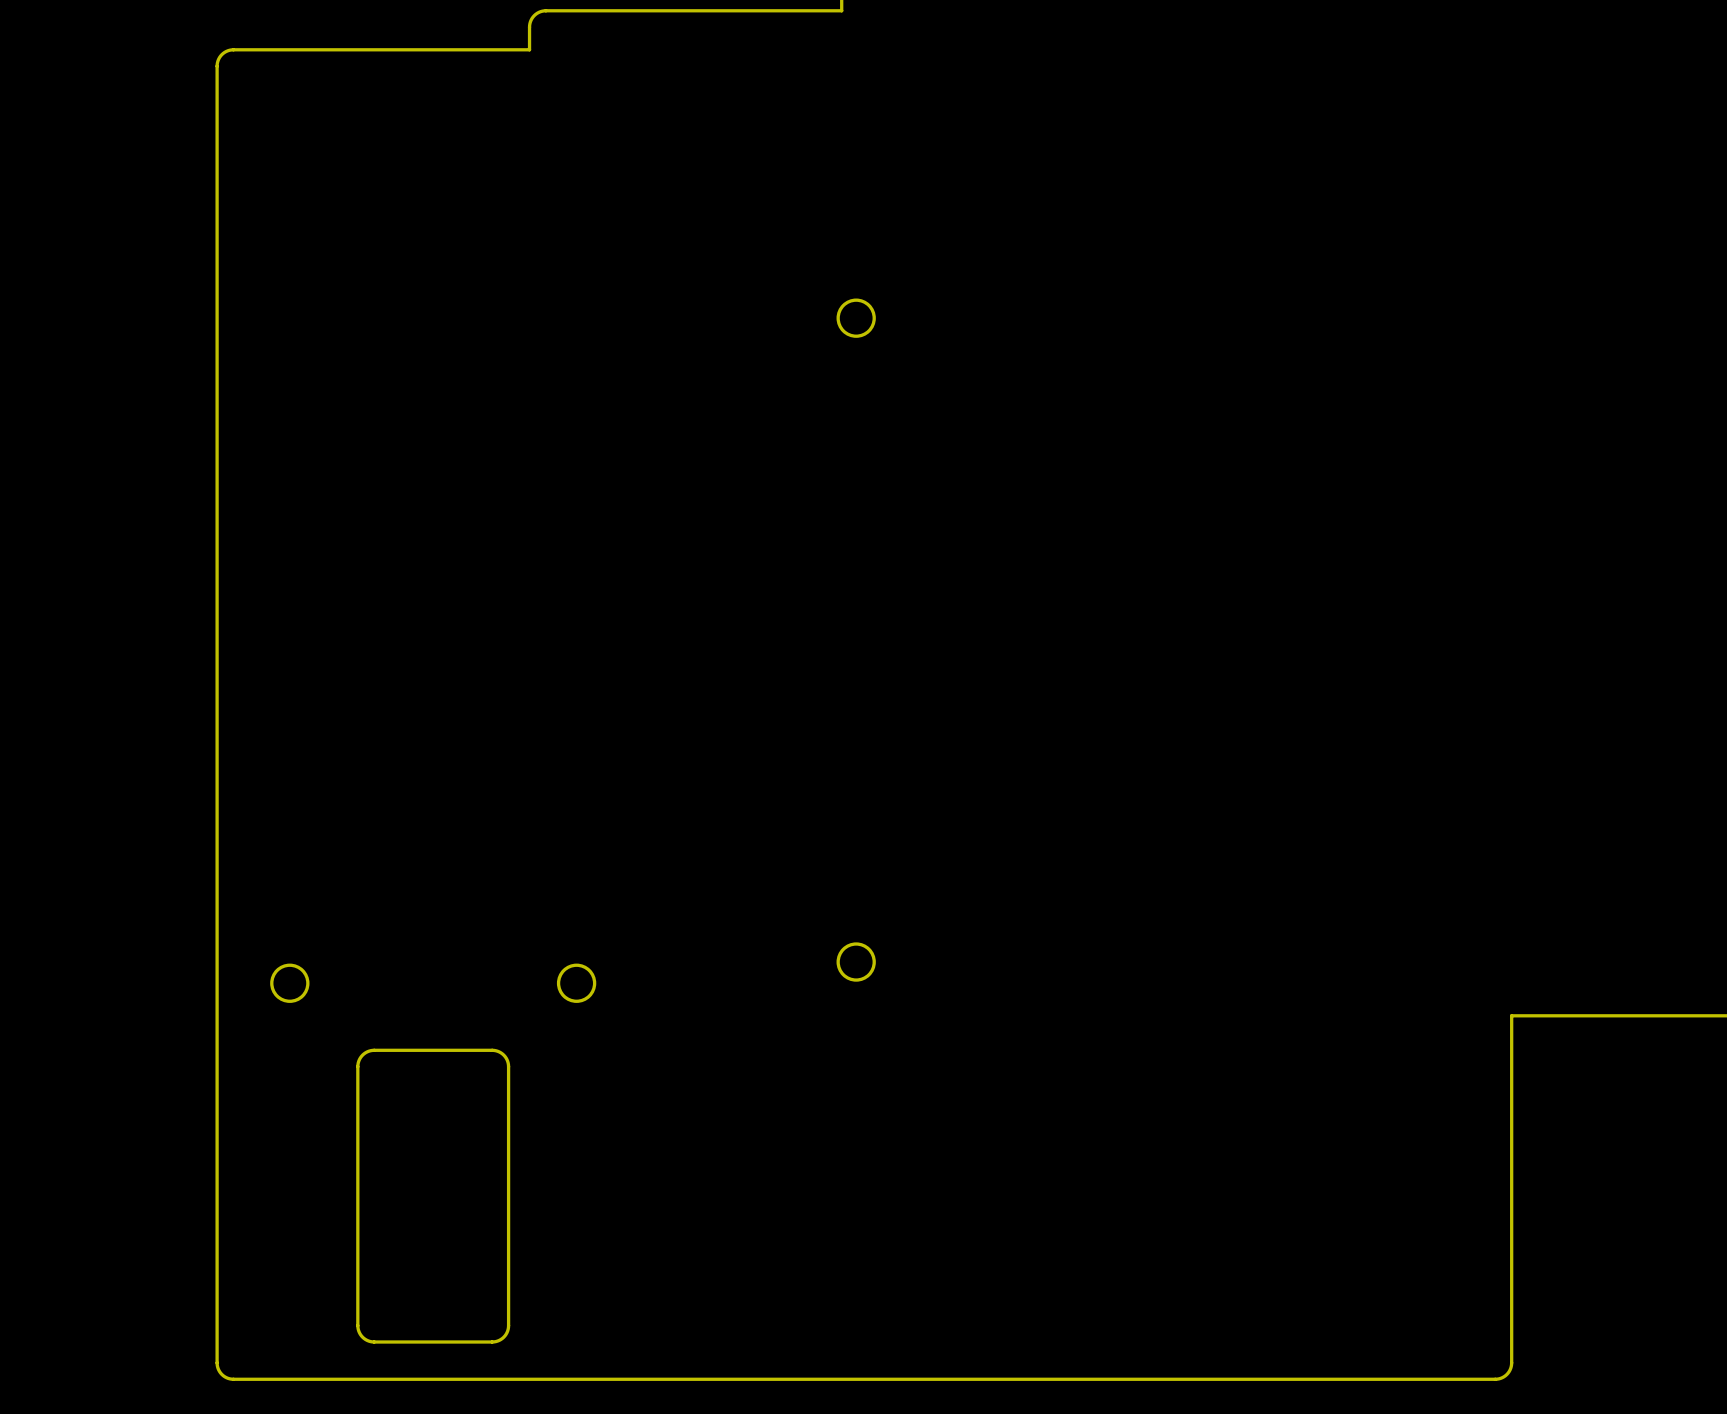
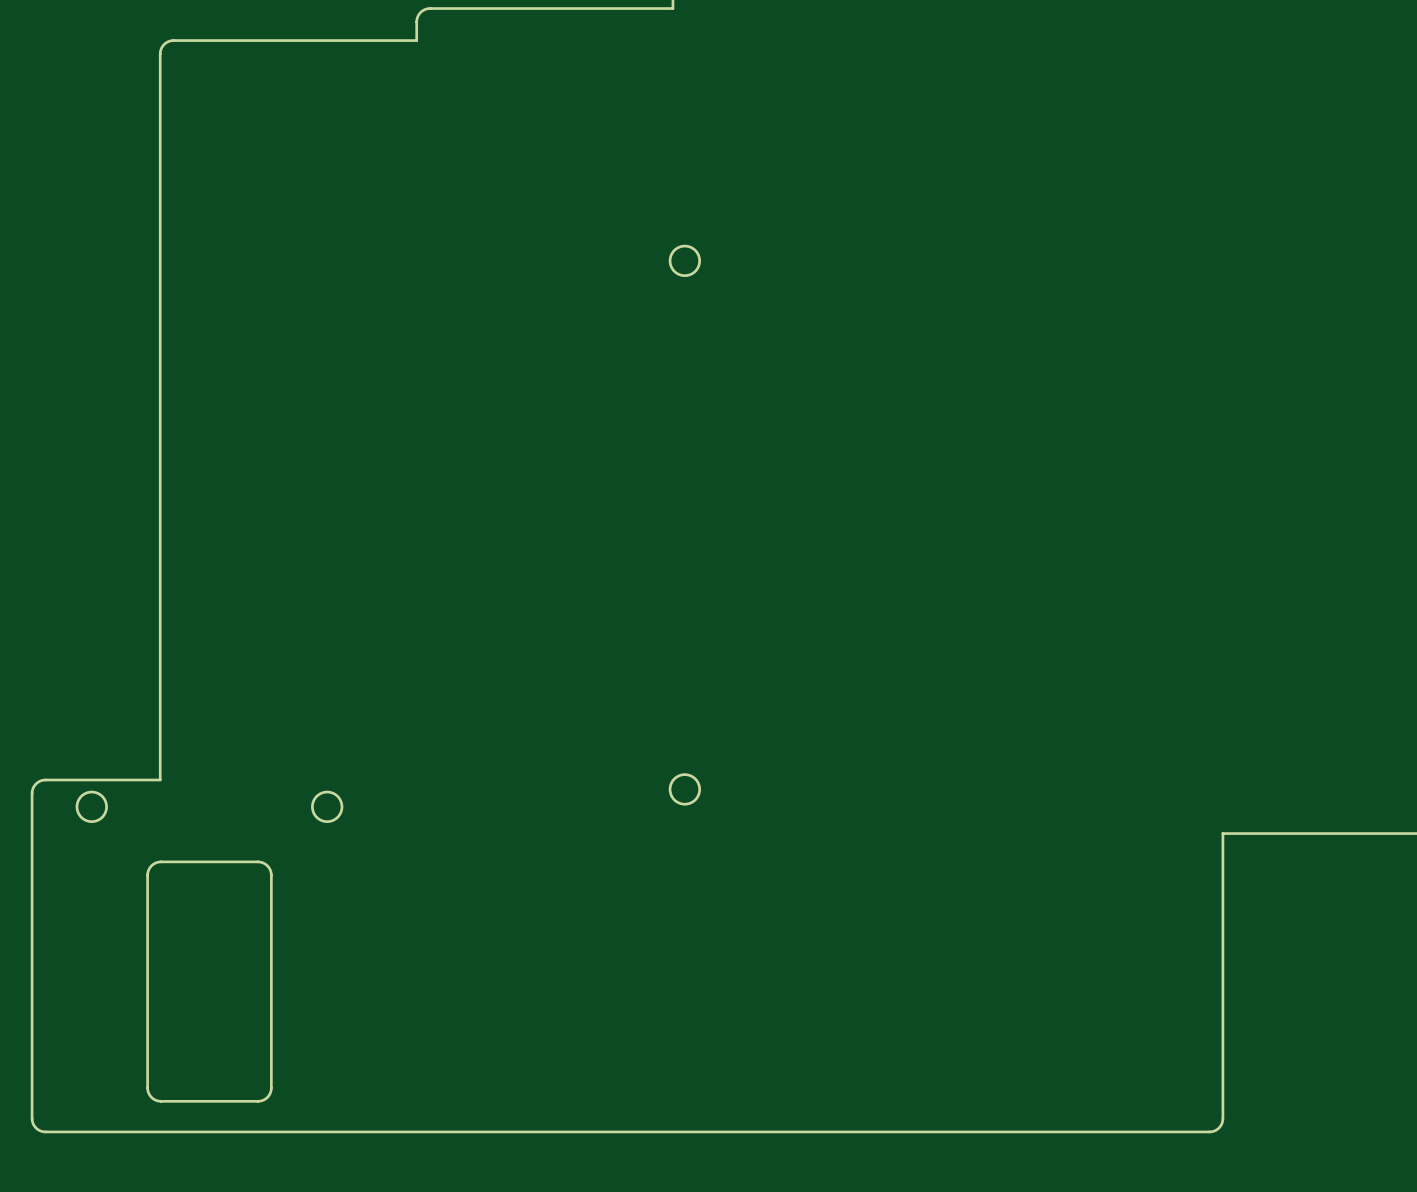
board edge: (217, 950) (217, 1362) (221, 1374) (233, 1379) -> (160, 779) (44, 780) (37, 782) (32, 789) (32, 1118) (35, 1126) (44, 1131) (173, 1131)
round board edge: none -> [75, 790, 108, 823]
round board edge: [270, 963, 310, 1003] -> none
round board edge: none -> [311, 790, 344, 823]
round board edge: [556, 963, 597, 1003] -> none
board edge: (374, 1050) (494, 1050) (502, 1053) (506, 1059) (508, 1066) (508, 1325) (506, 1334) (499, 1340) (492, 1342) (374, 1342) (365, 1339) (359, 1332) (357, 1325) (357, 1066) (362, 1055) (374, 1050) -> (161, 861) (259, 861) (265, 863) (270, 869) (271, 1087) (269, 1095) (263, 1100) (161, 1101) (153, 1099) (148, 1093) (147, 875) (151, 865) (161, 861)

